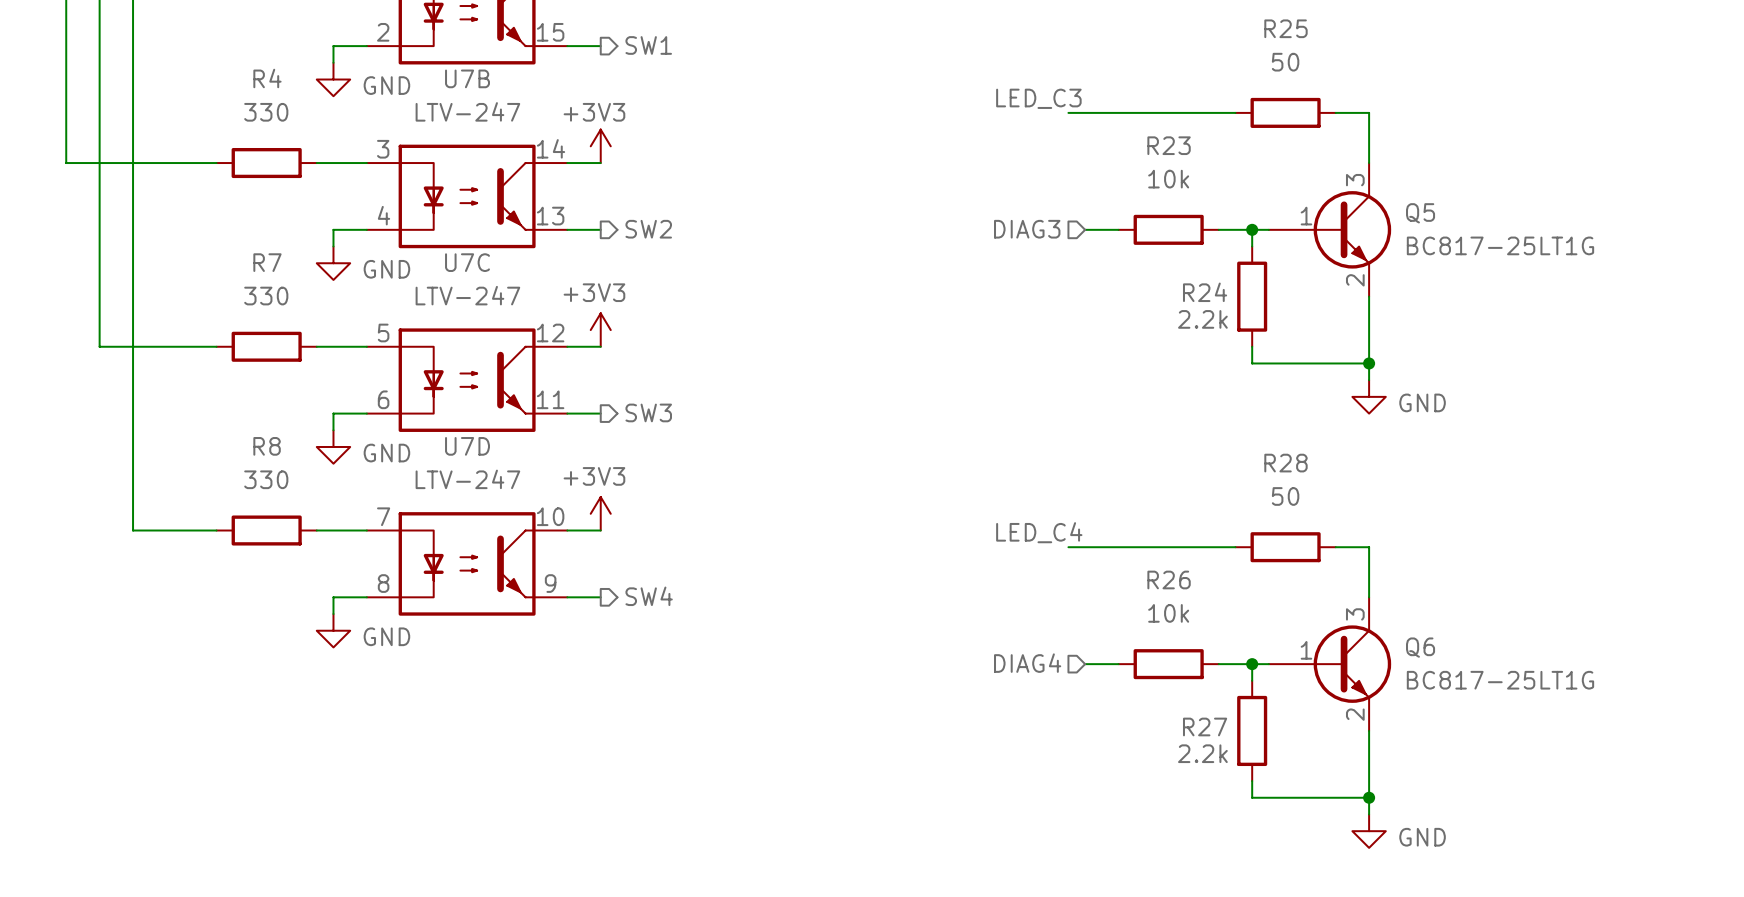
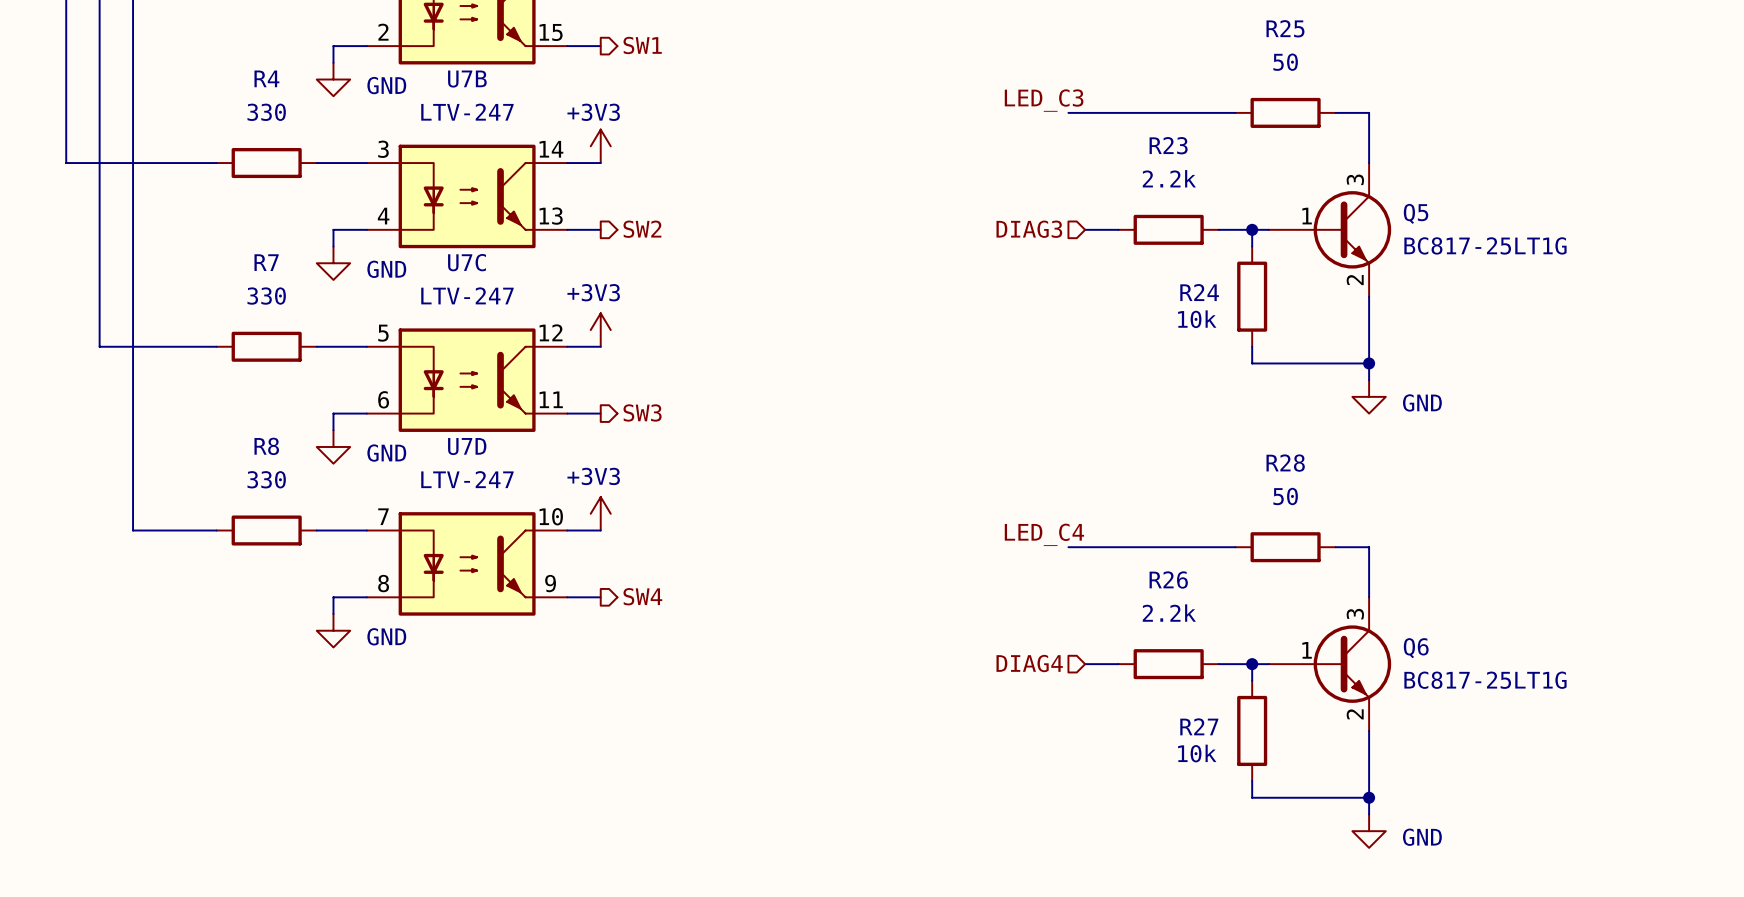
R23 value: 10k (1168, 179) -> 2.2k (1169, 178)
R24 value: 2.2k (1202, 319) -> 10k (1197, 319)
R26 value: 10k (1168, 613) -> 2.2k (1169, 613)
R27 value: 2.2k (1202, 753) -> 10k (1197, 753)

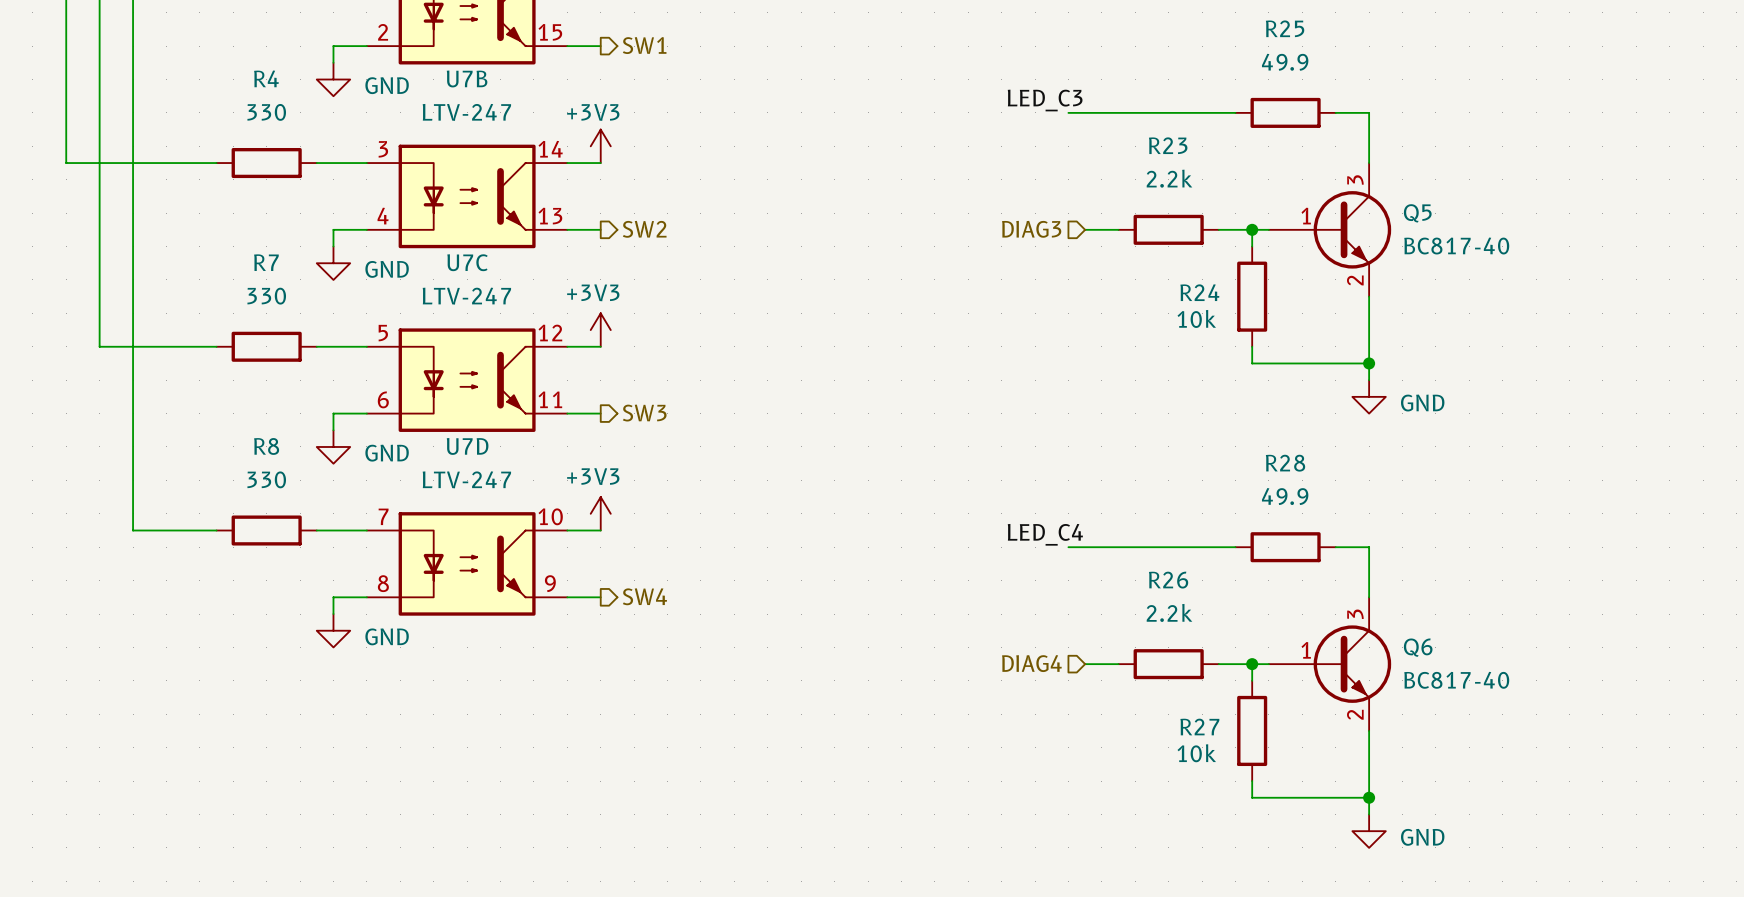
R25 value: 50 (1285, 62) -> 49.9 (1285, 62)
Q5 value: BC817-25LT1G (1485, 245) -> BC817-40 (1456, 246)
R28 value: 50 (1285, 496) -> 49.9 (1285, 496)
Q6 value: BC817-25LT1G (1485, 680) -> BC817-40 (1456, 680)

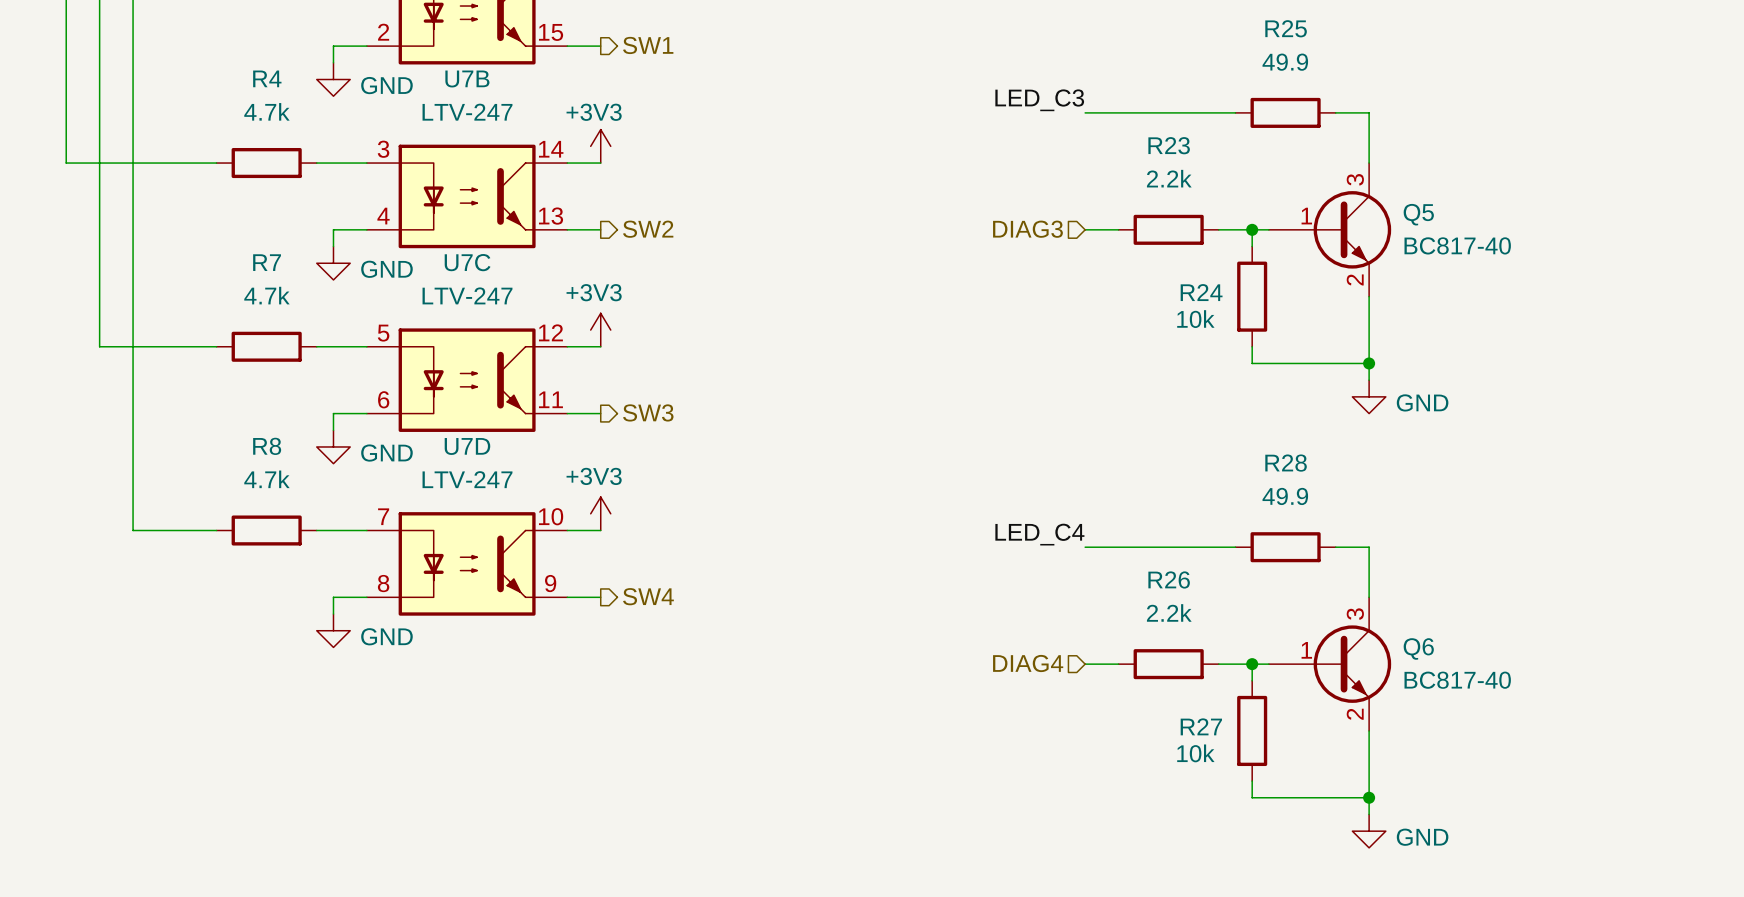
R4 value: 330 (266, 112) -> 4.7k (266, 111)
wire: (1068, 112) (1085, 112) -> none
R7 value: 330 (266, 296) -> 4.7k (266, 295)
R8 value: 330 (266, 479) -> 4.7k (266, 479)
wire: (1068, 547) (1085, 547) -> none

